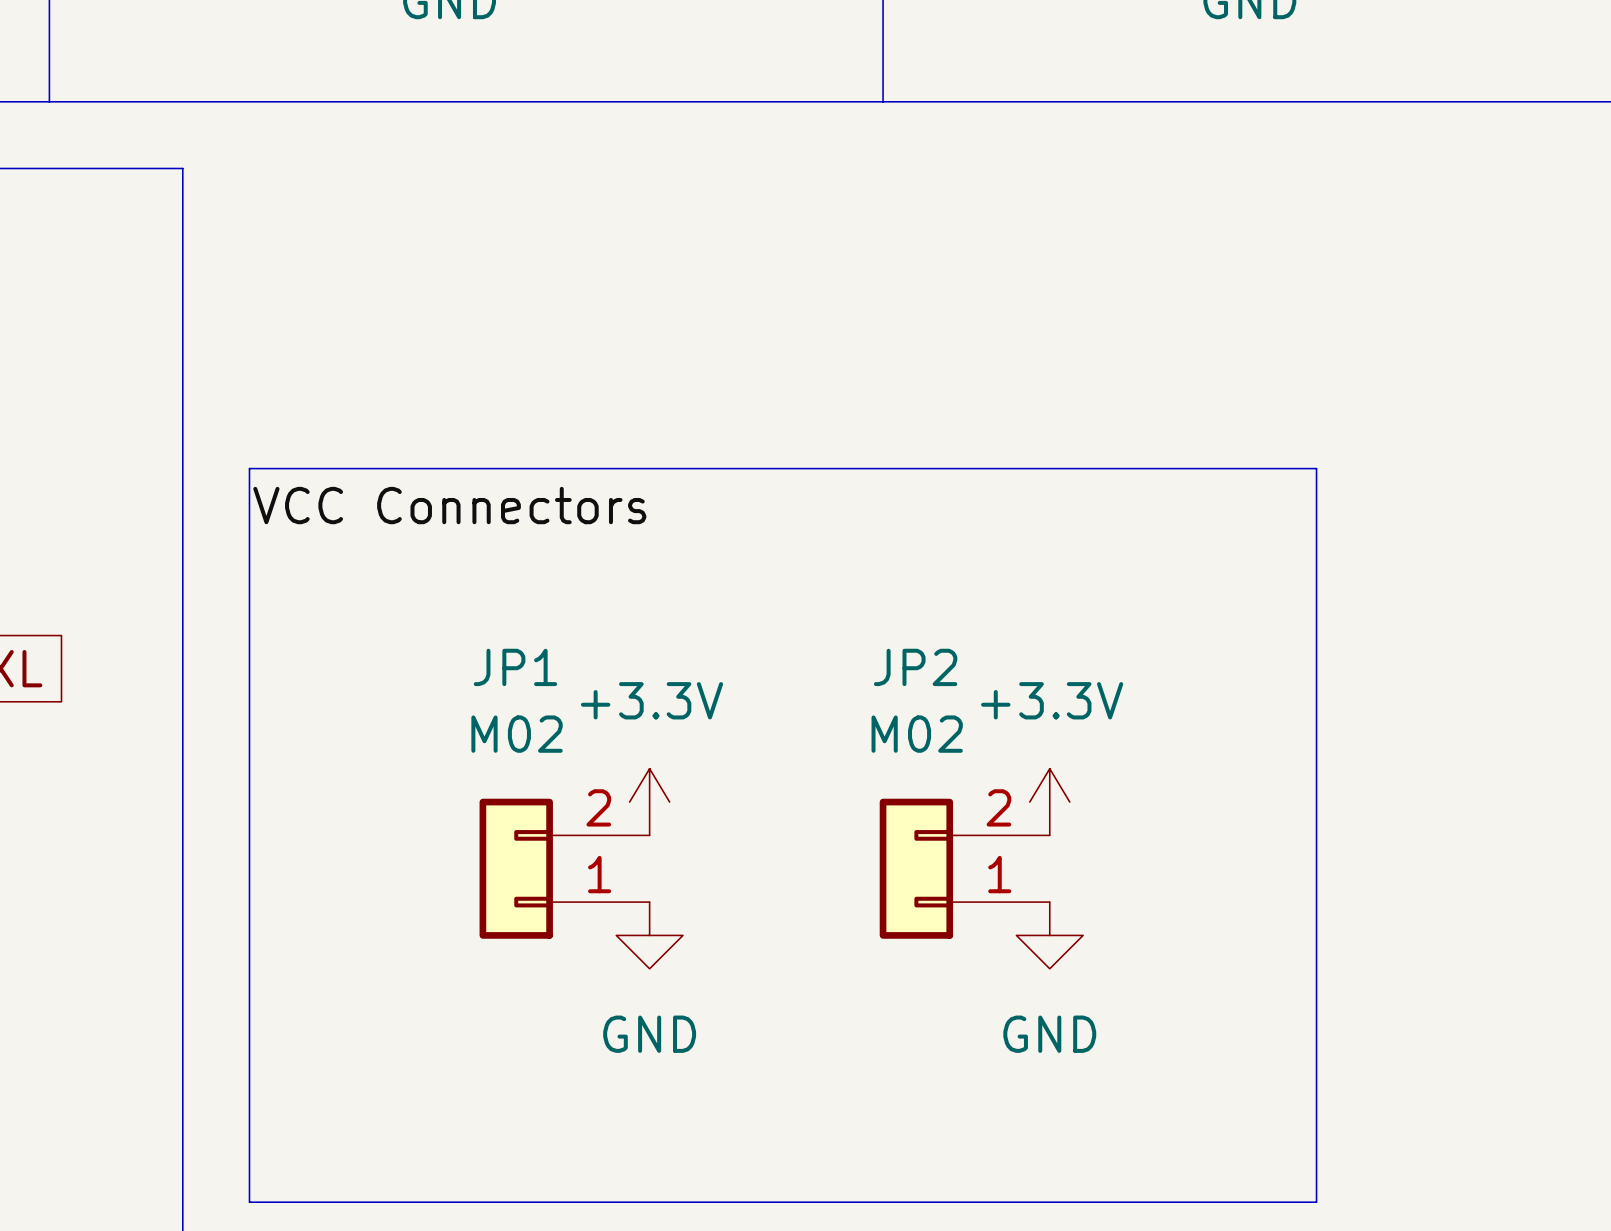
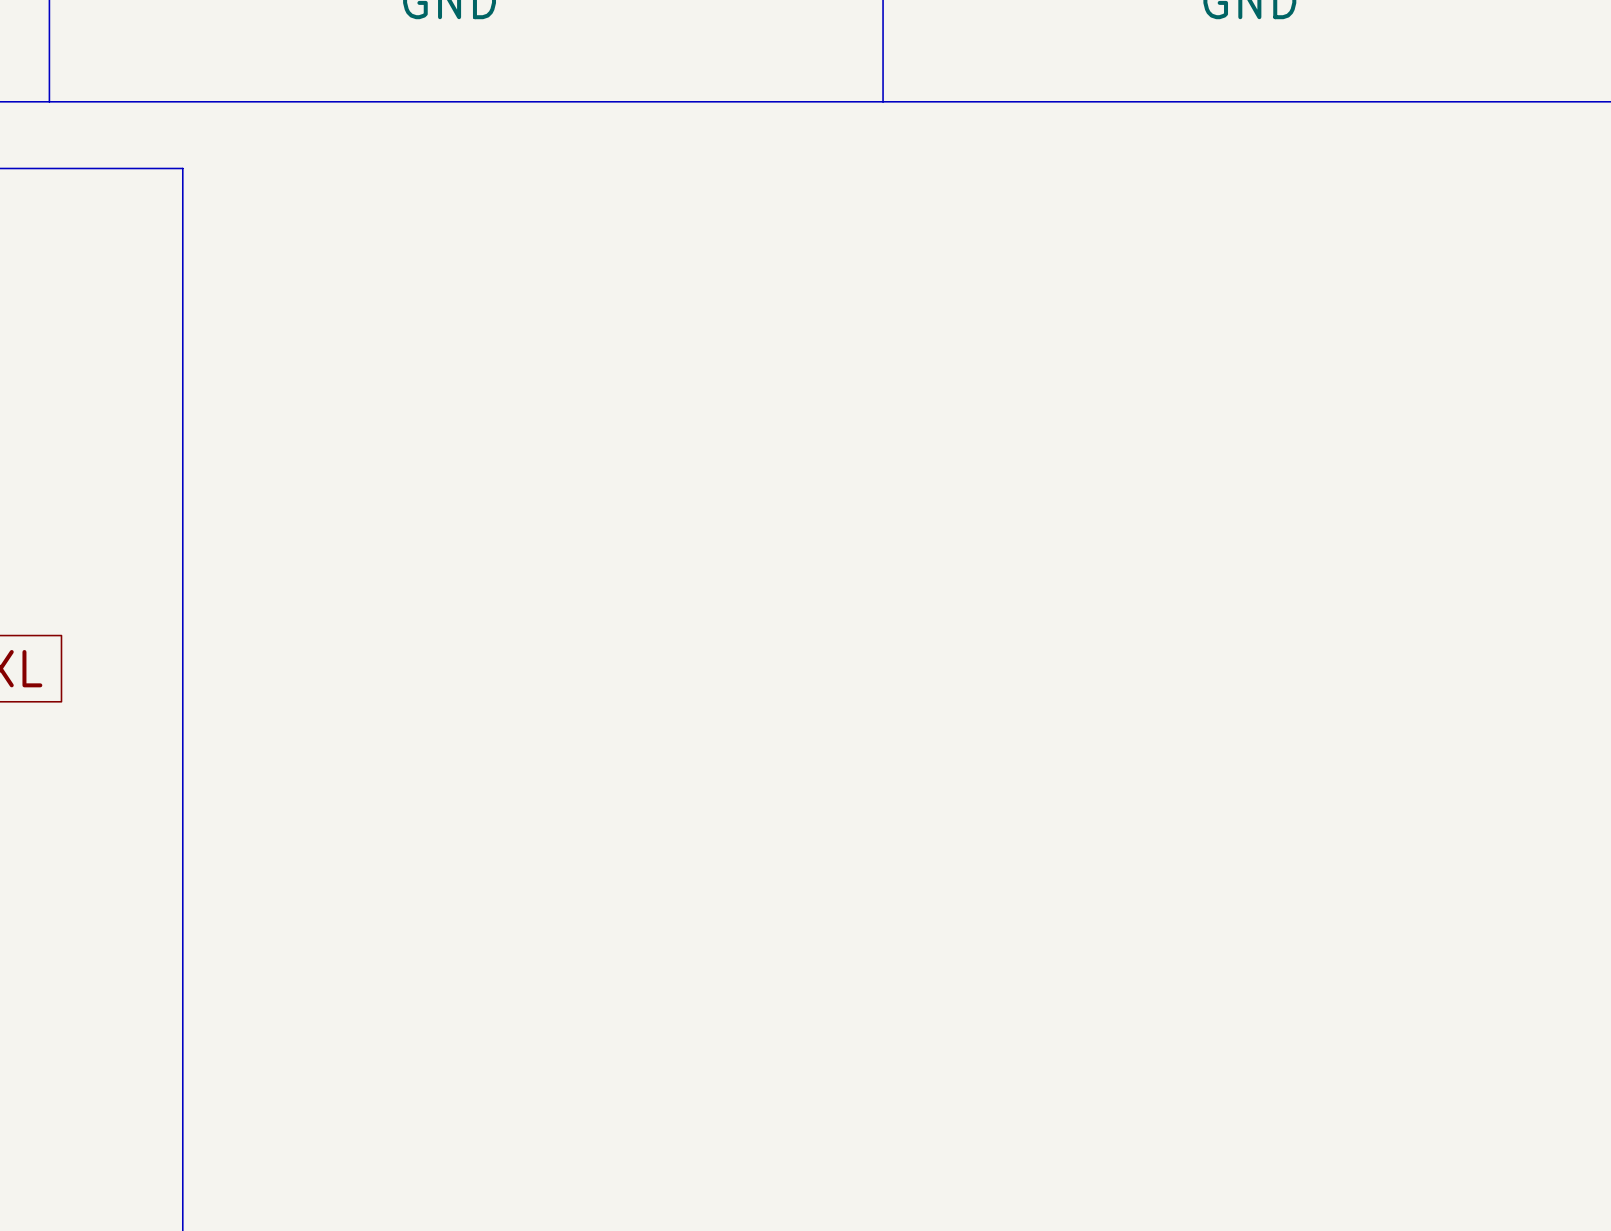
line: (249, 468) (1316, 468) (1316, 1202) (249, 1202) (249, 468) -> none
label: VCC Connectors (449, 505) -> none
power symbol: +3.3V (649, 802) -> none
power symbol: +3.3V (1049, 802) -> none
JP1: M02 (564, 868) -> none
JP2: M02 (964, 868) -> none
power symbol: GND (649, 935) -> none
power symbol: GND (1049, 935) -> none

